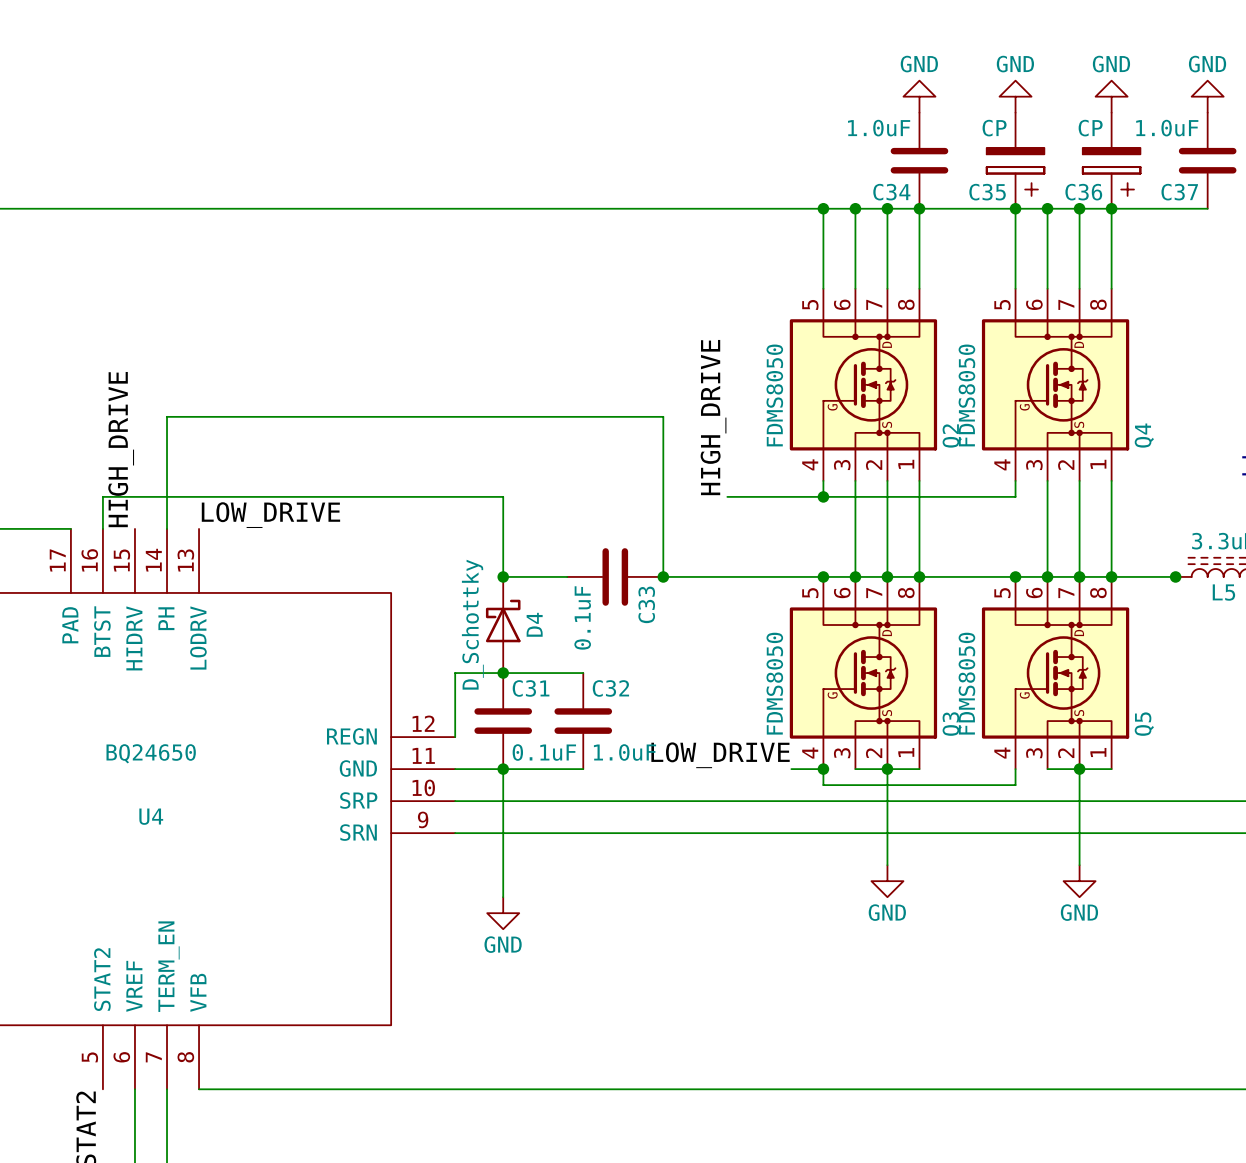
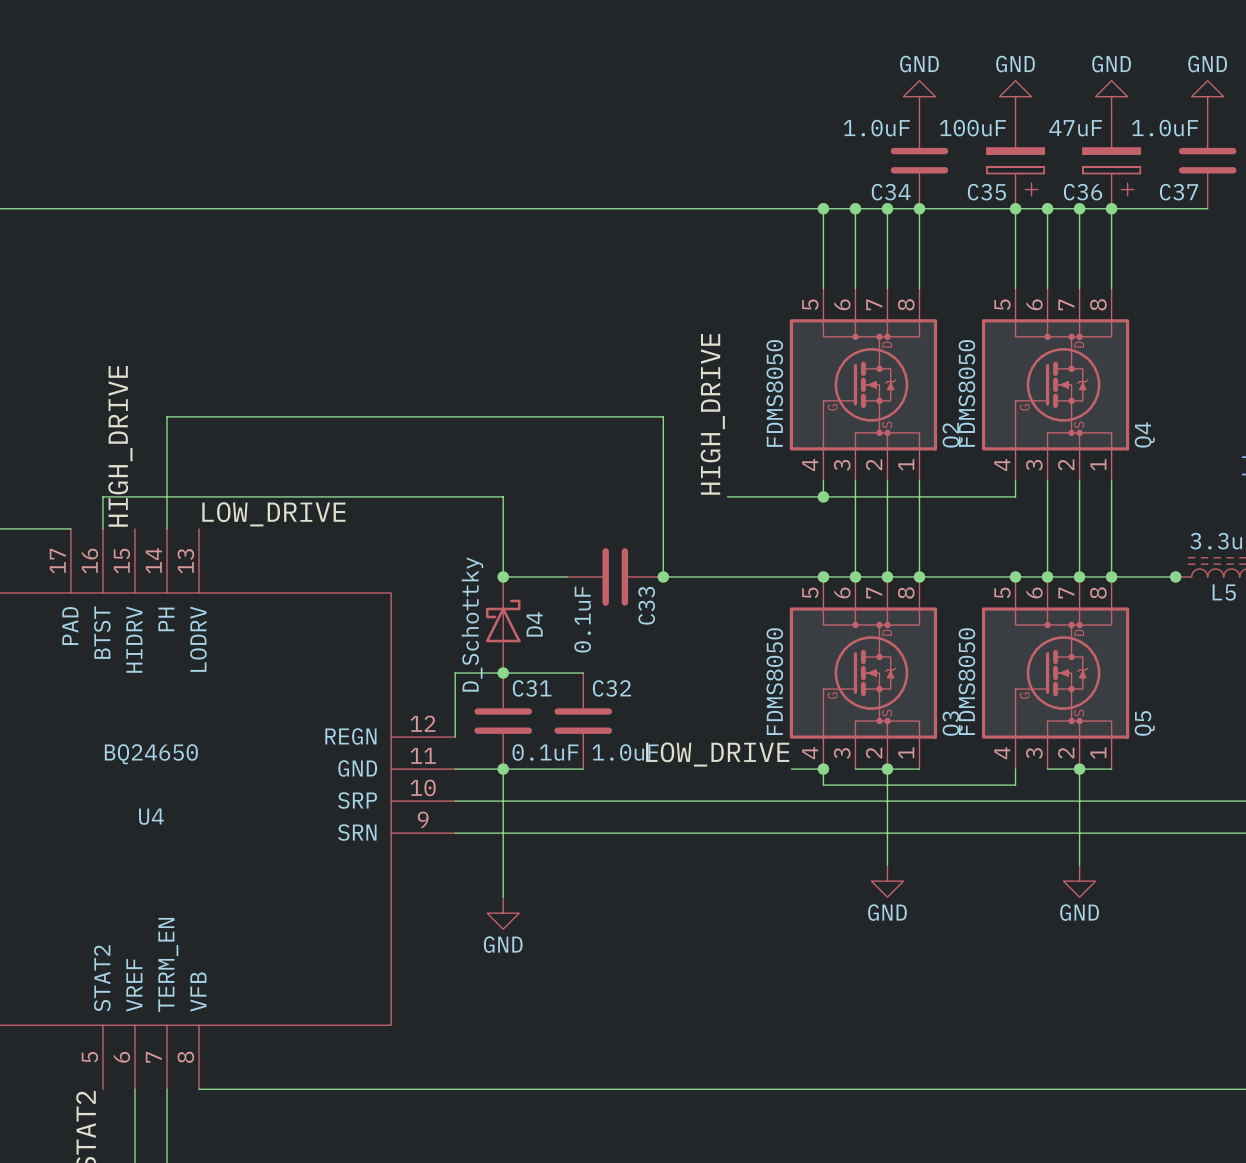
C35 value: CP (994, 128) -> 100uF (972, 128)
C36 value: CP (1090, 128) -> 47uF (1075, 128)

